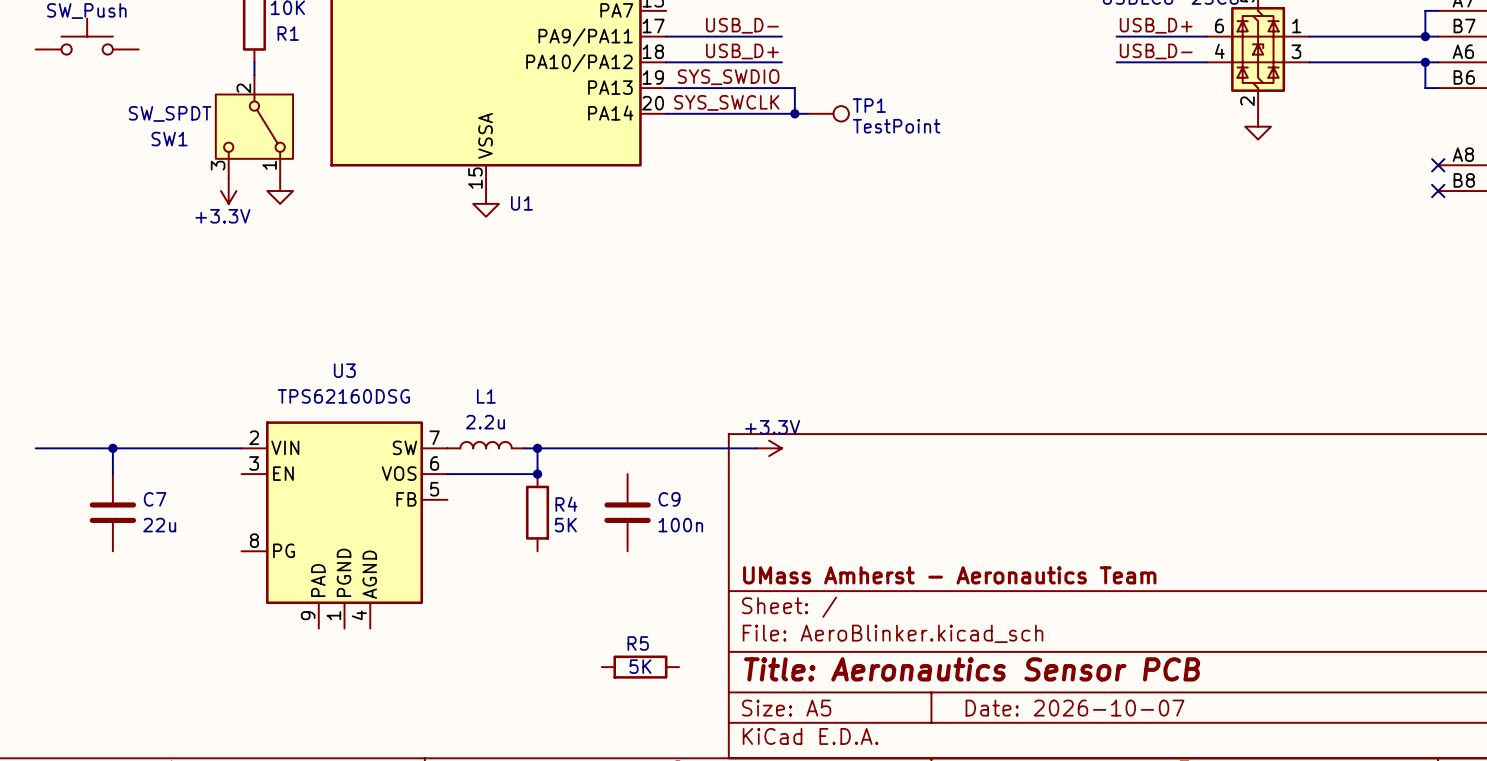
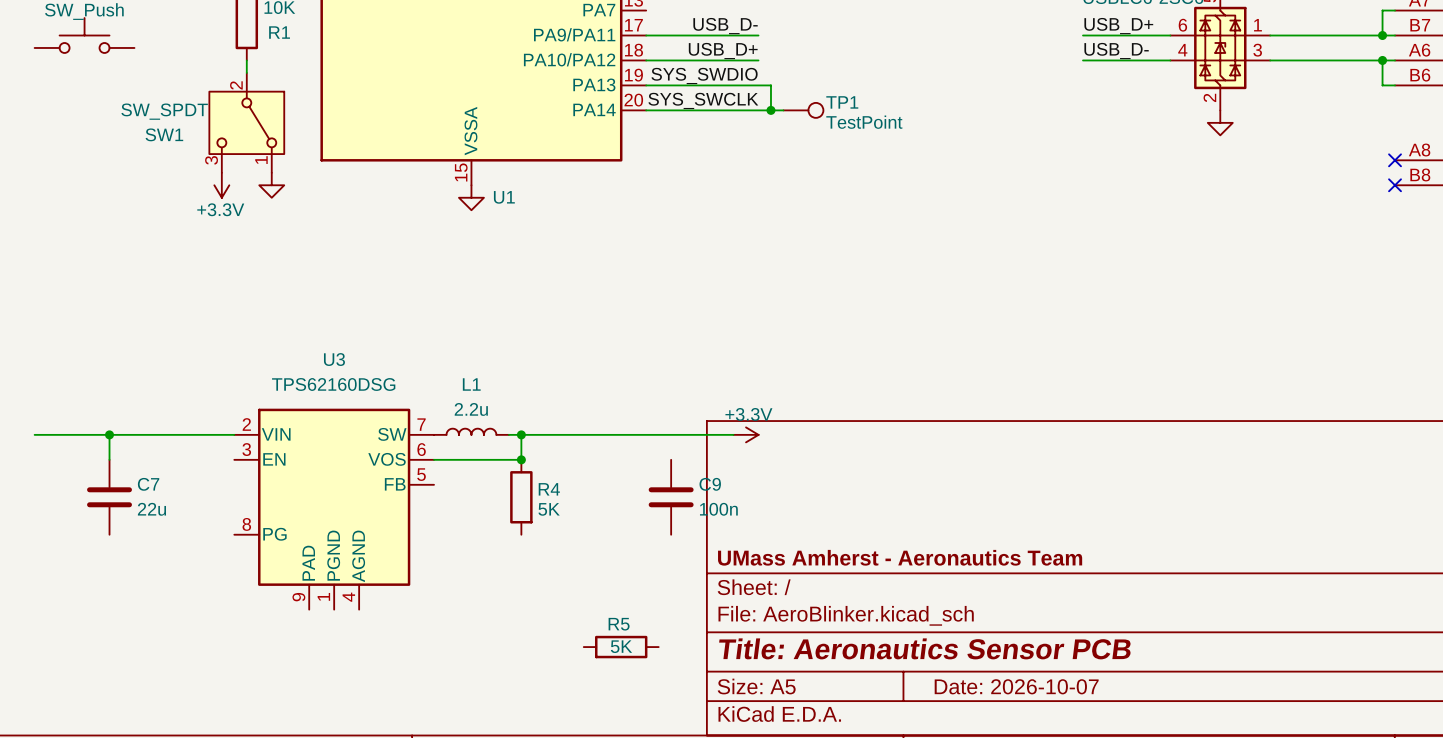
C9 position: (627, 512) -> (671, 497)

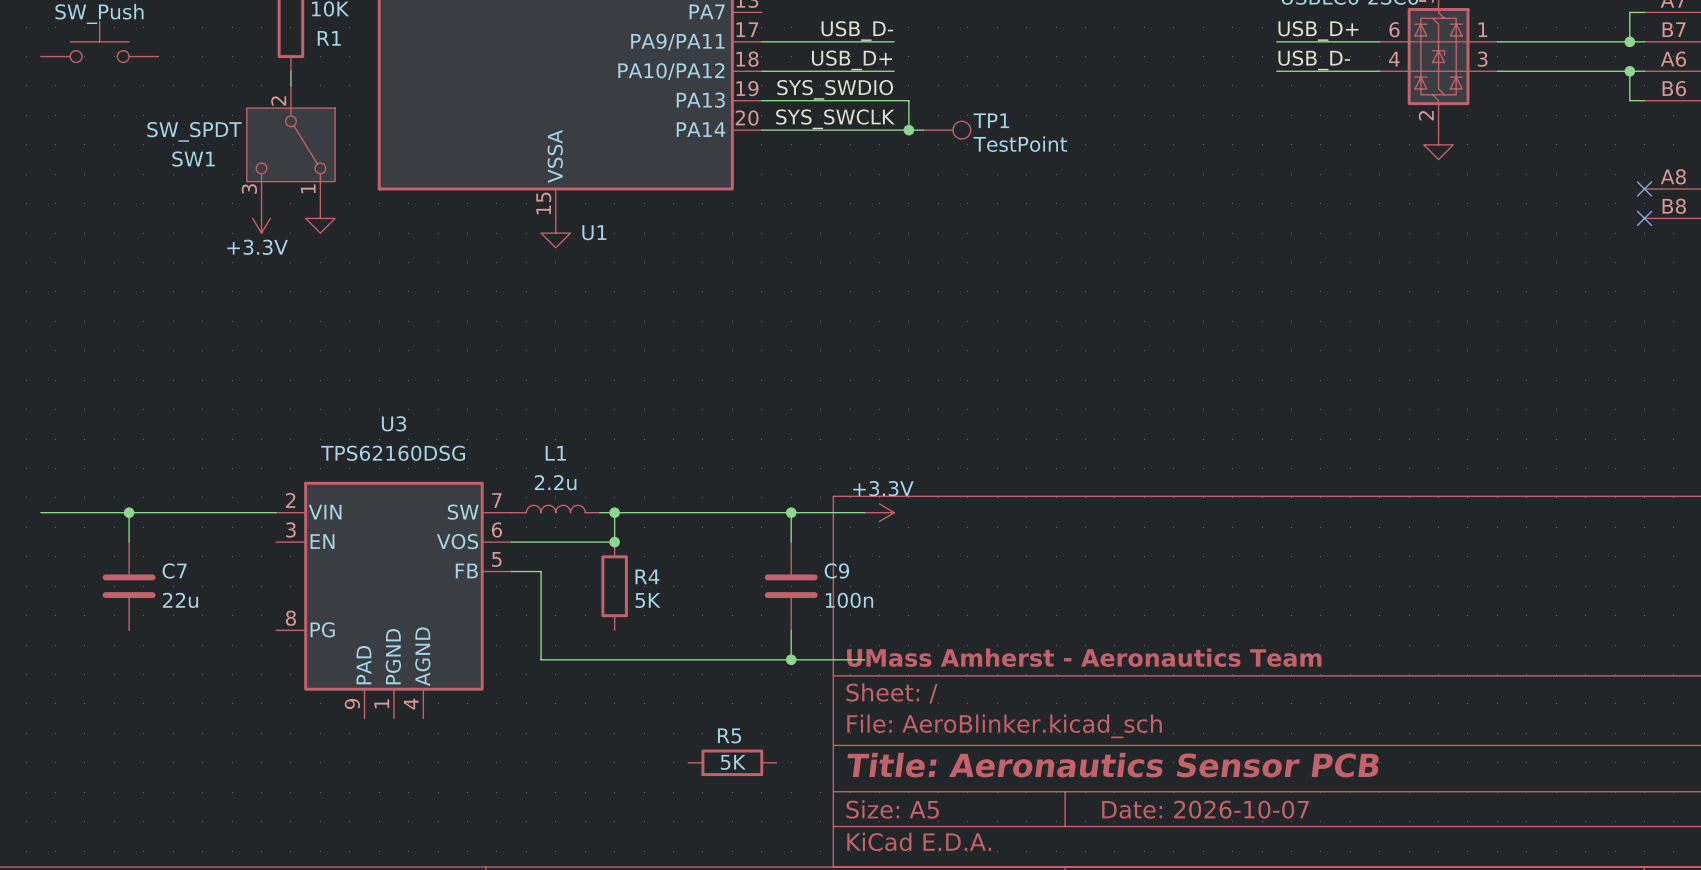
wire: none -> (791, 512) (791, 542)
junction: none -> (791, 512)
wire: none -> (511, 571) (541, 571) (541, 659) (864, 659)
wire: none -> (791, 630) (791, 659)
junction: none -> (791, 659)

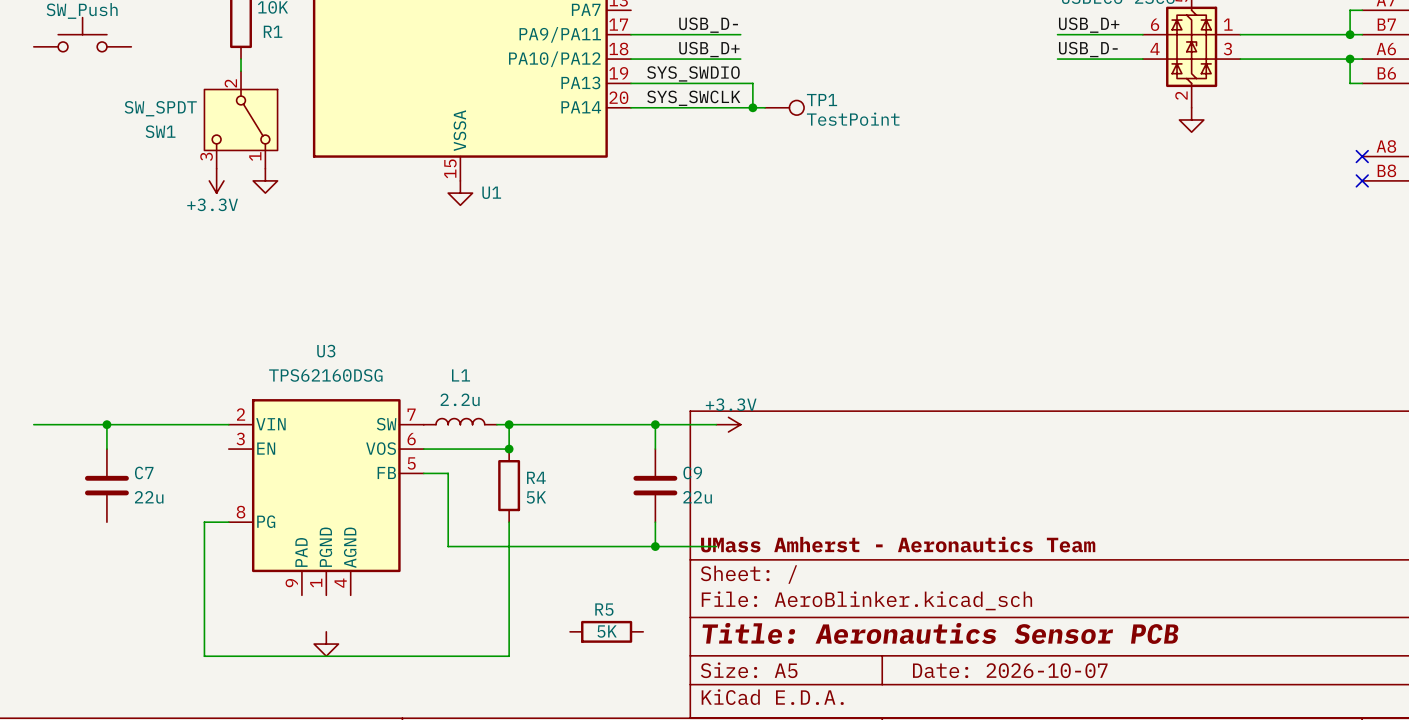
C9 value: 100n (849, 600) -> 22u (697, 497)
wire: none -> (228, 522) (204, 522) (204, 656) (509, 656) (509, 522)
power symbol: none -> (326, 644)

